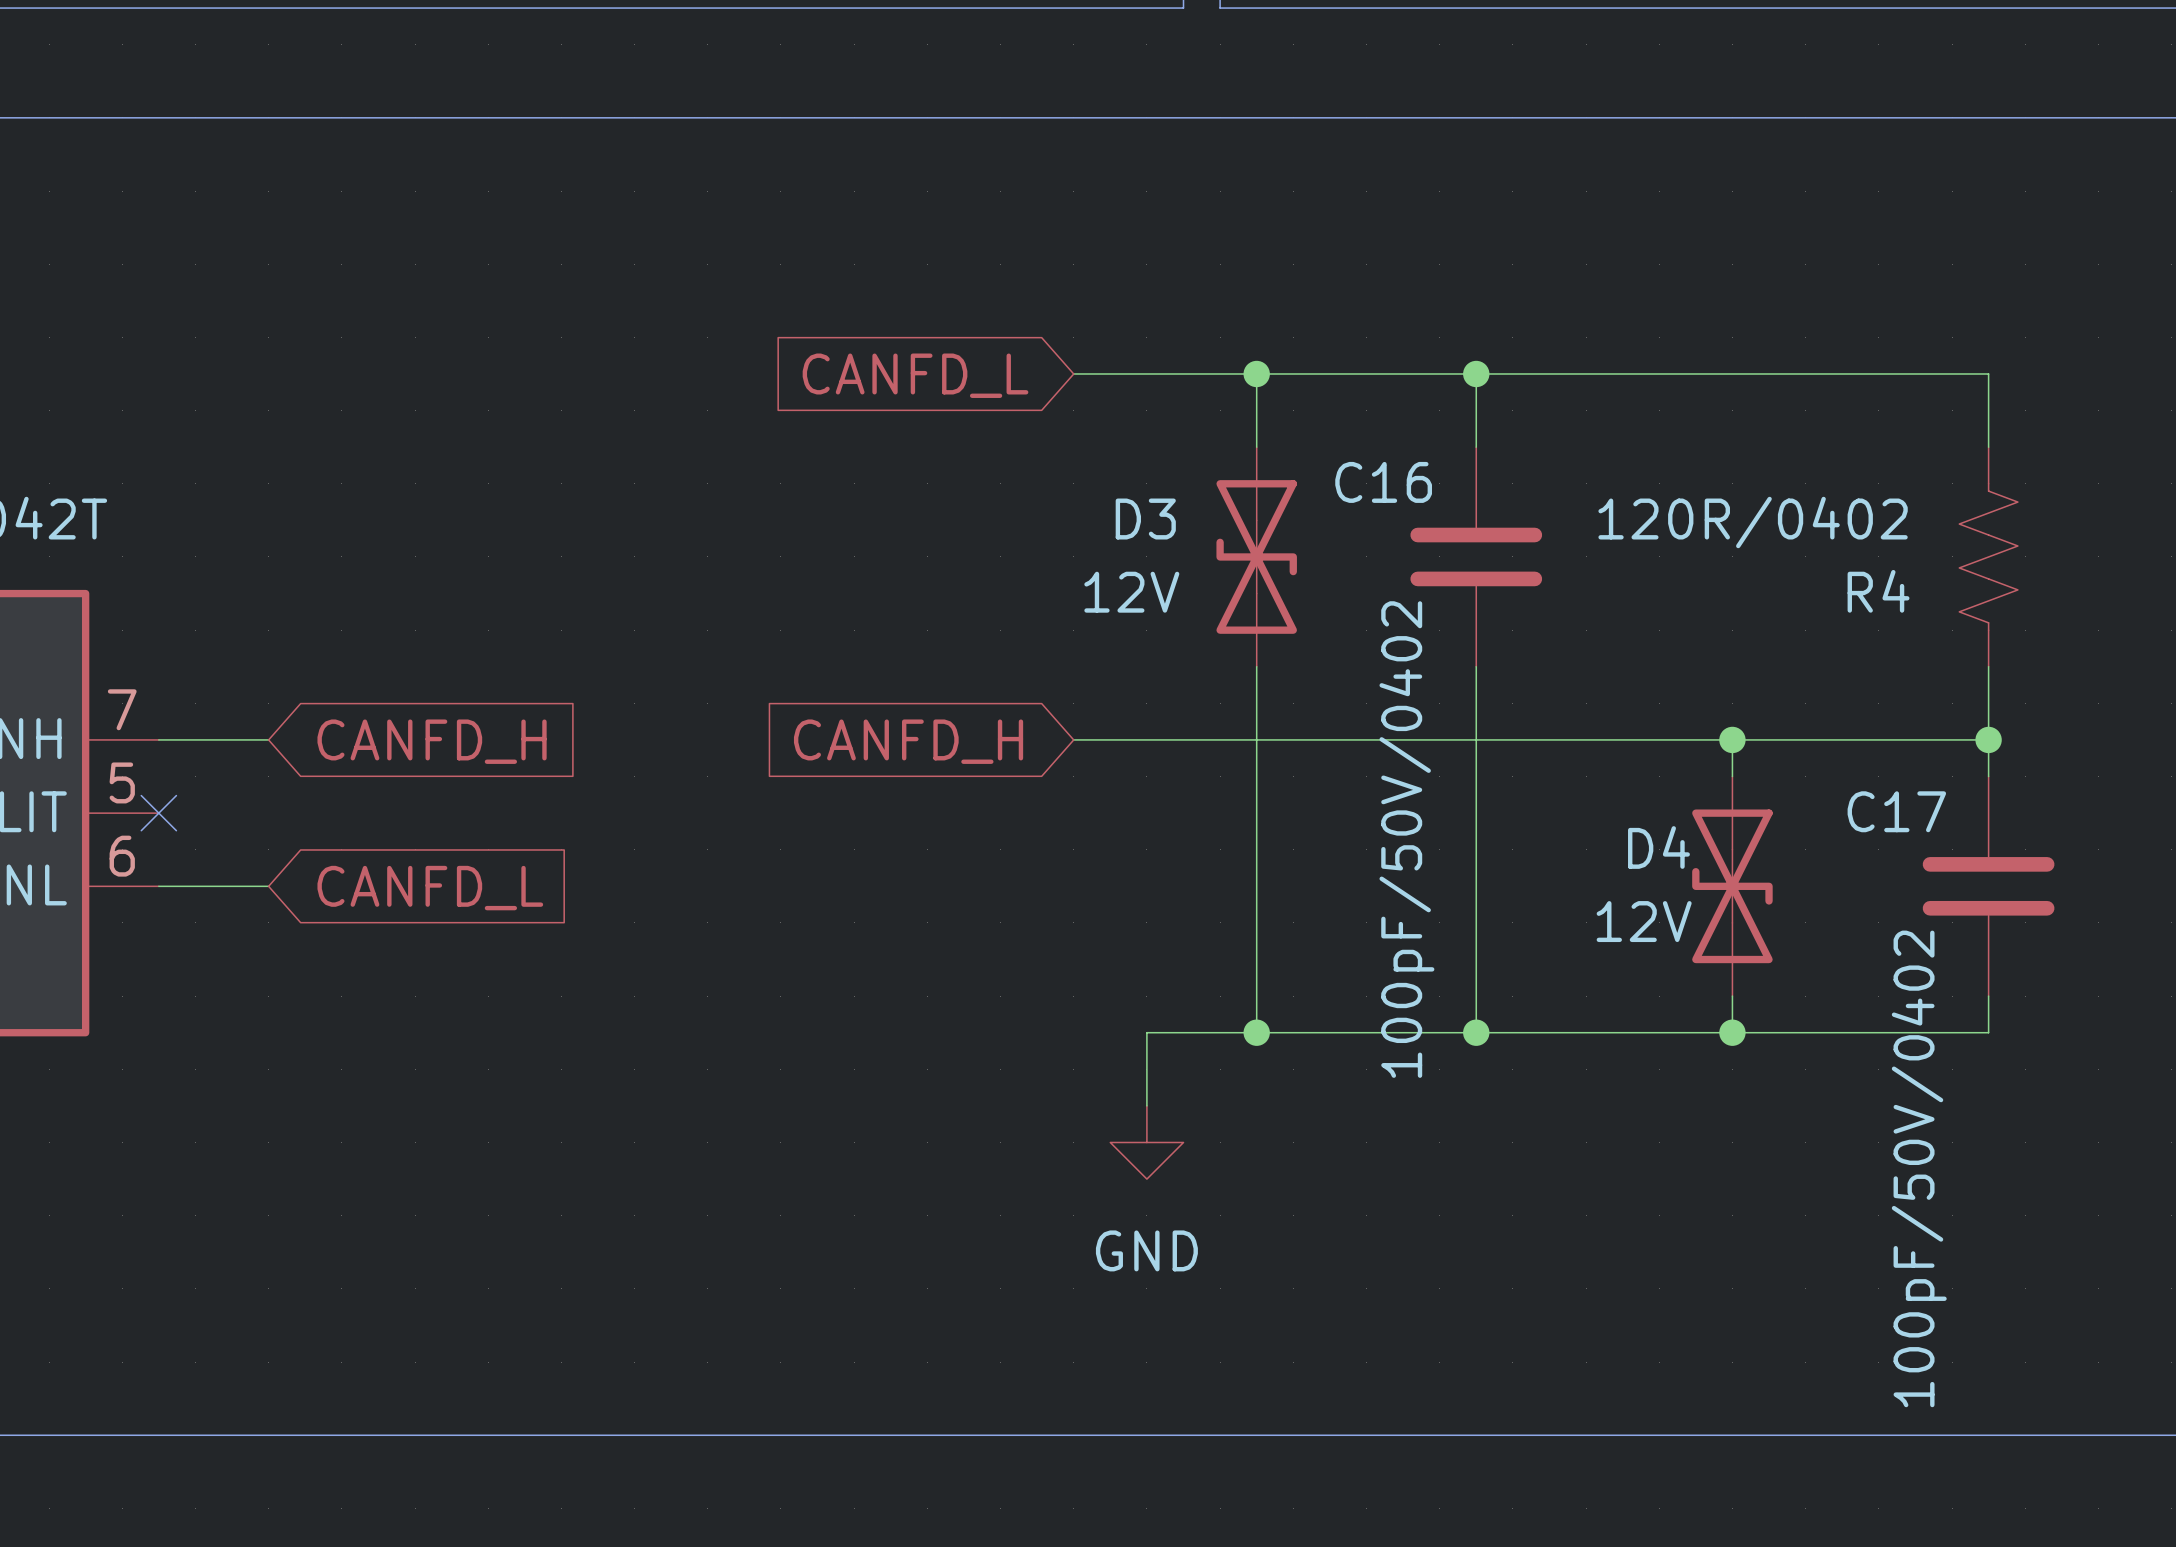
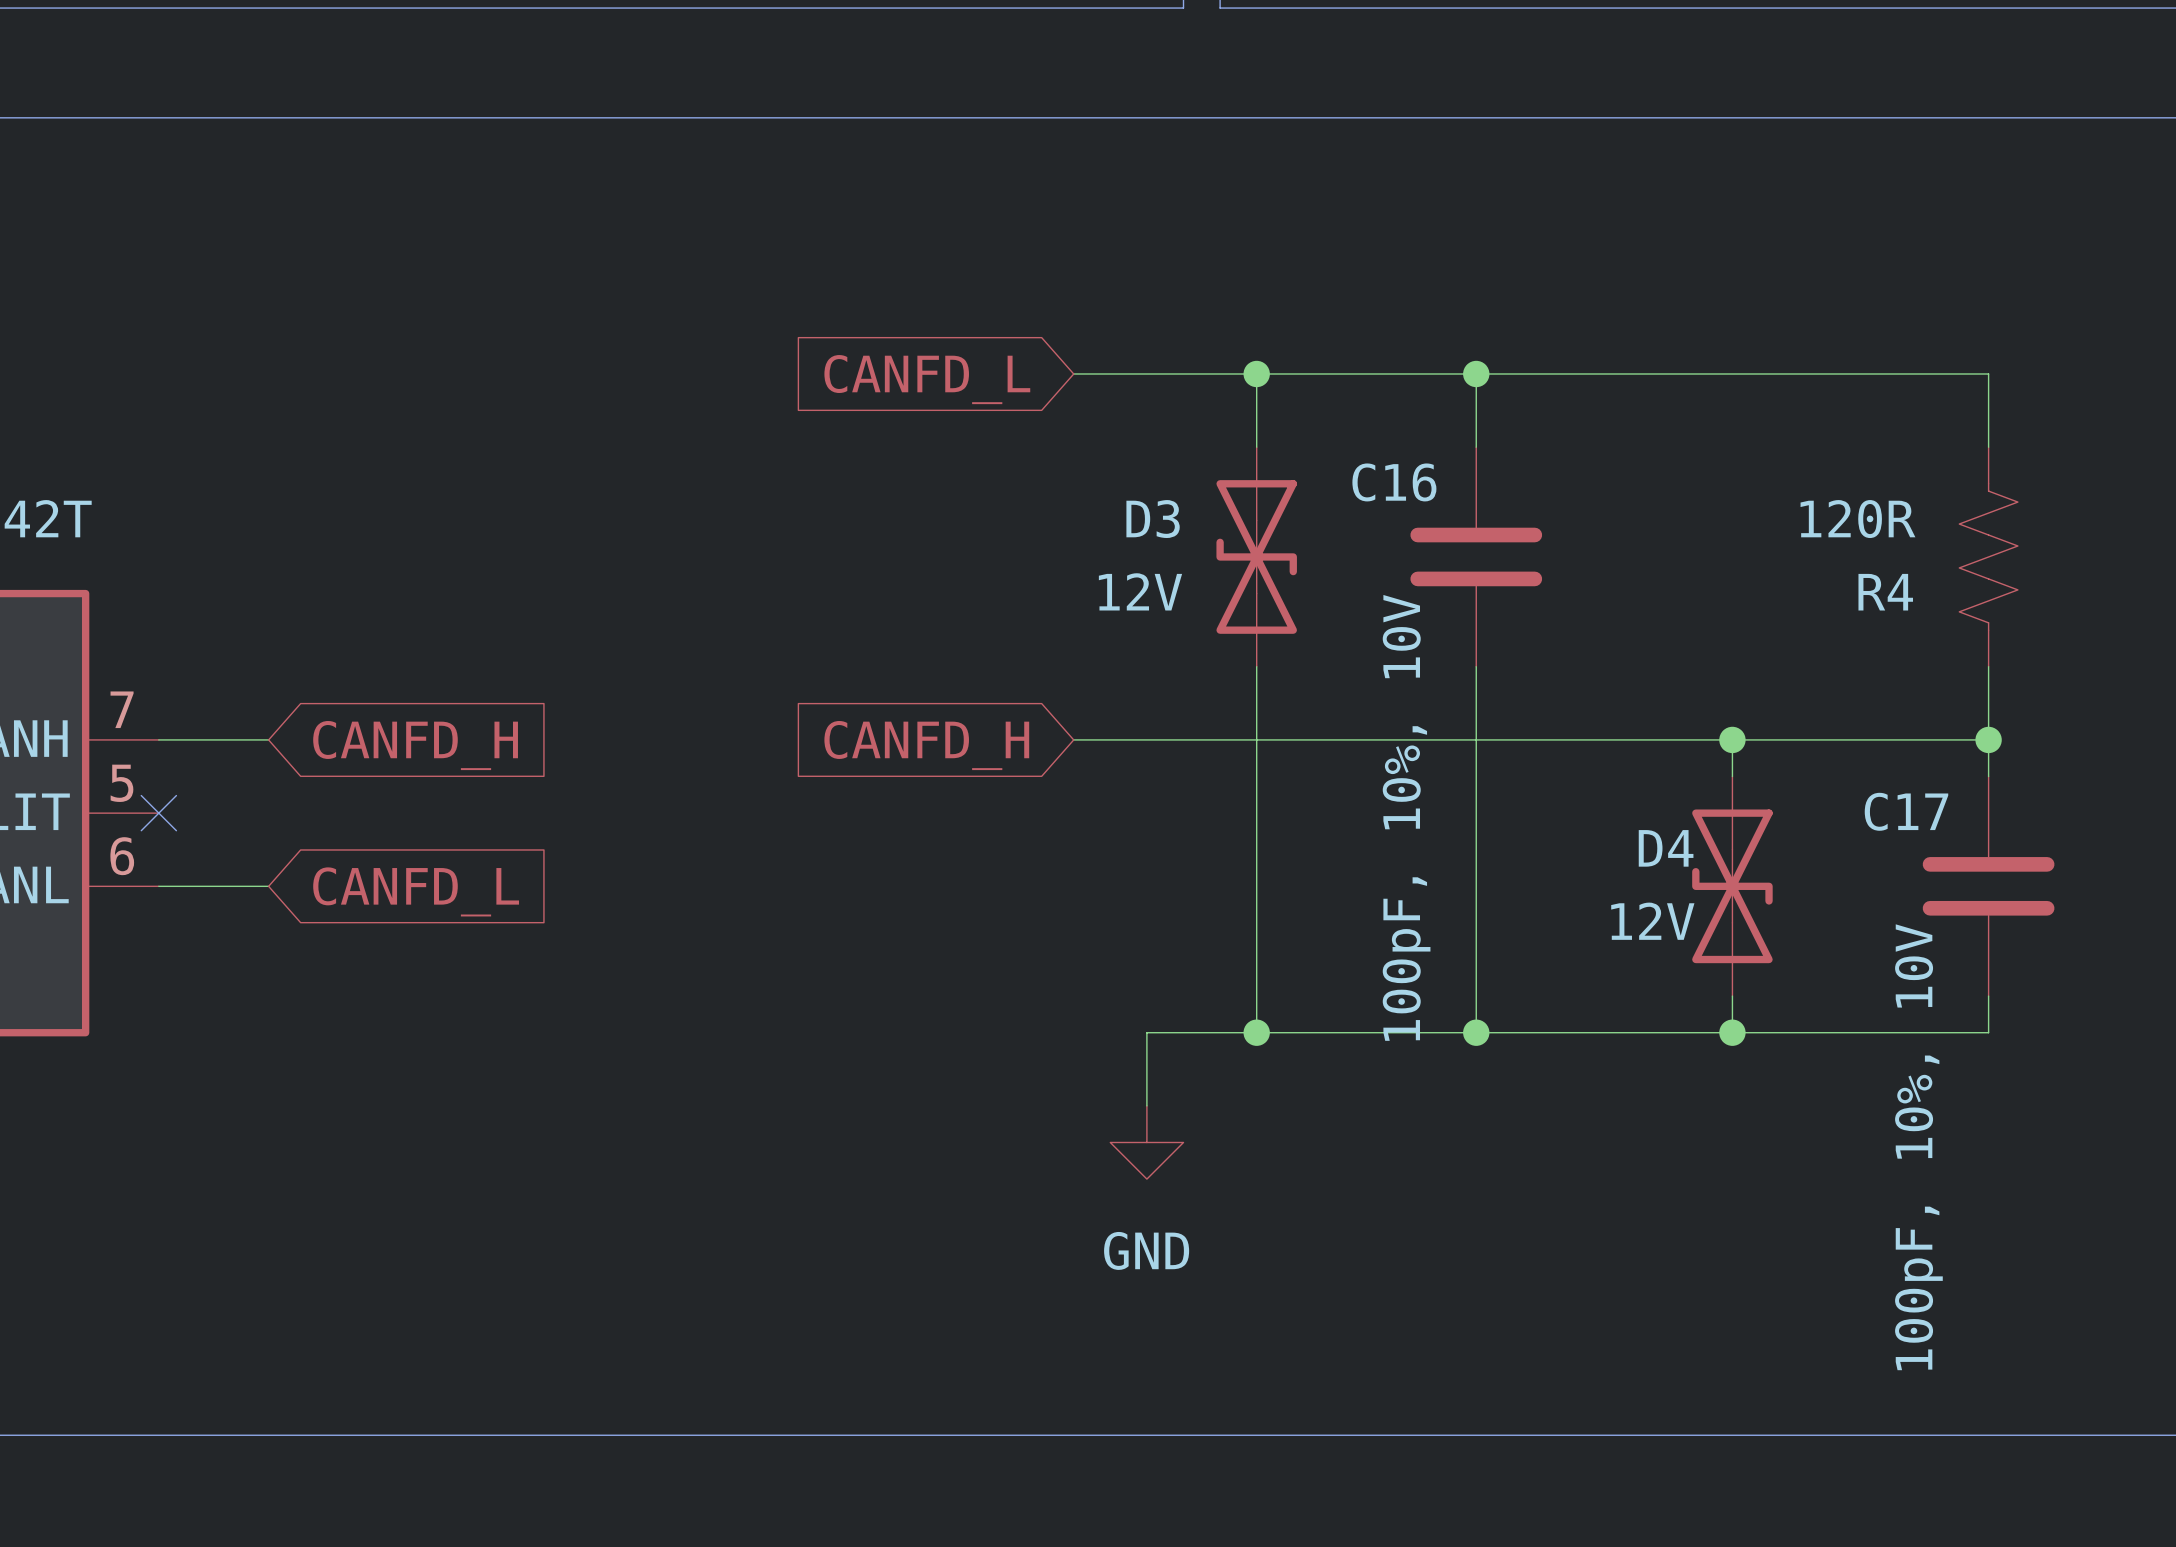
R4 value: 120R/0402 (1753, 522) -> 120R (1857, 519)
C16 value: 100pF/50V/0402 (1406, 839) -> 100pF, 10%, 10V (1406, 817)
C17 value: 100pF/50V/0402 (1919, 1168) -> 100pF, 10%, 10V (1918, 1147)

